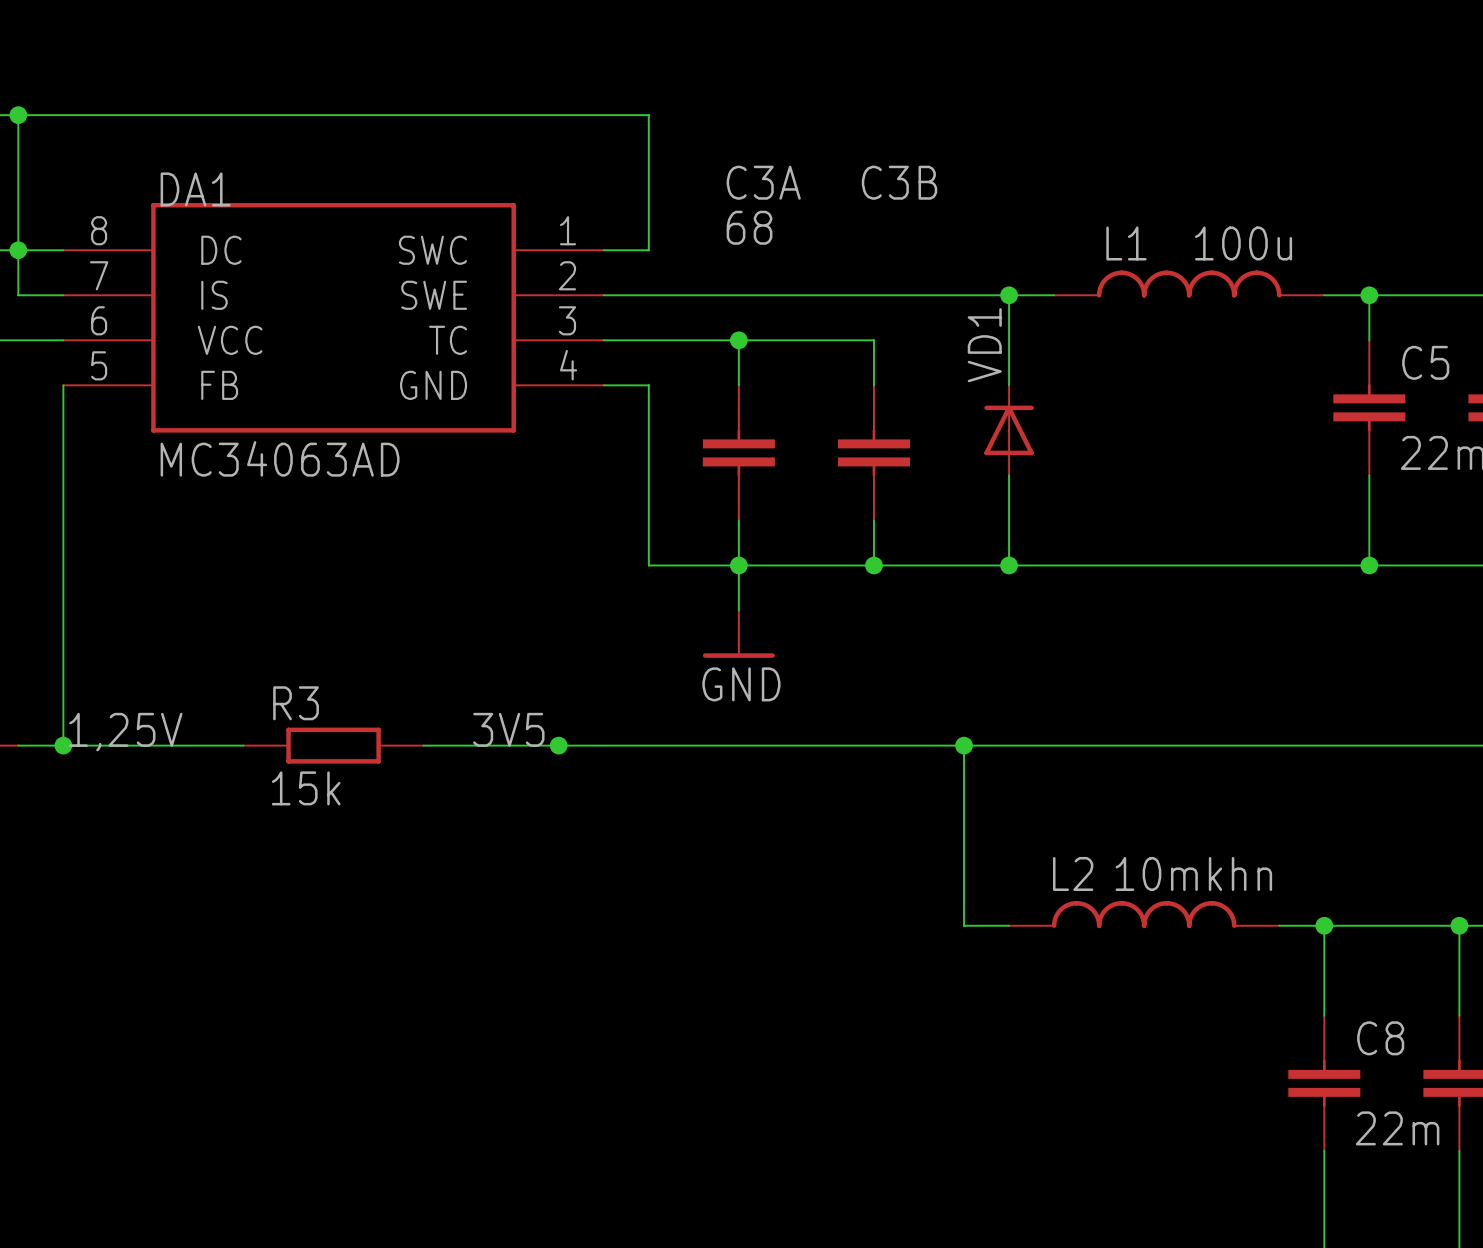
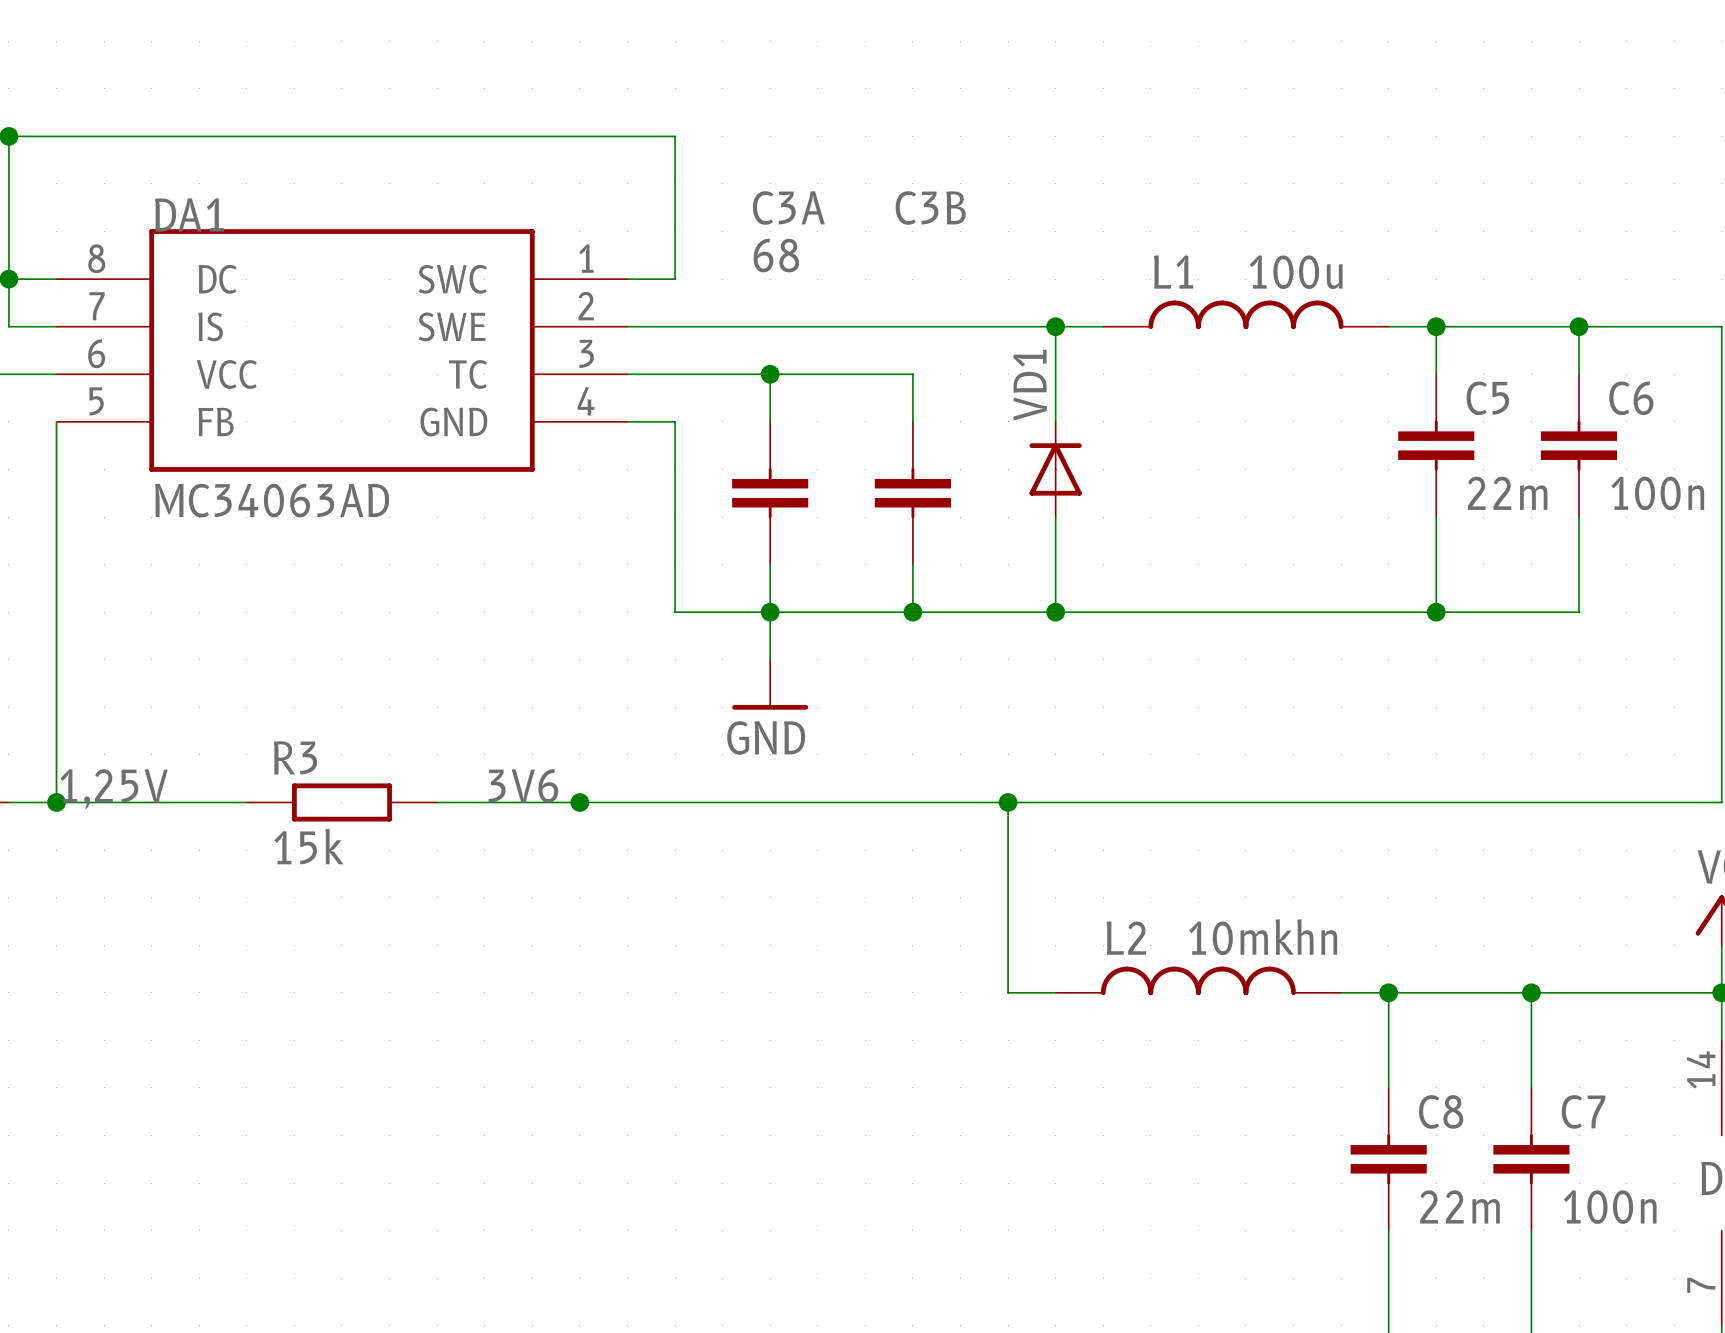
label: 3V5 (508, 729) -> 3V6 (523, 786)

